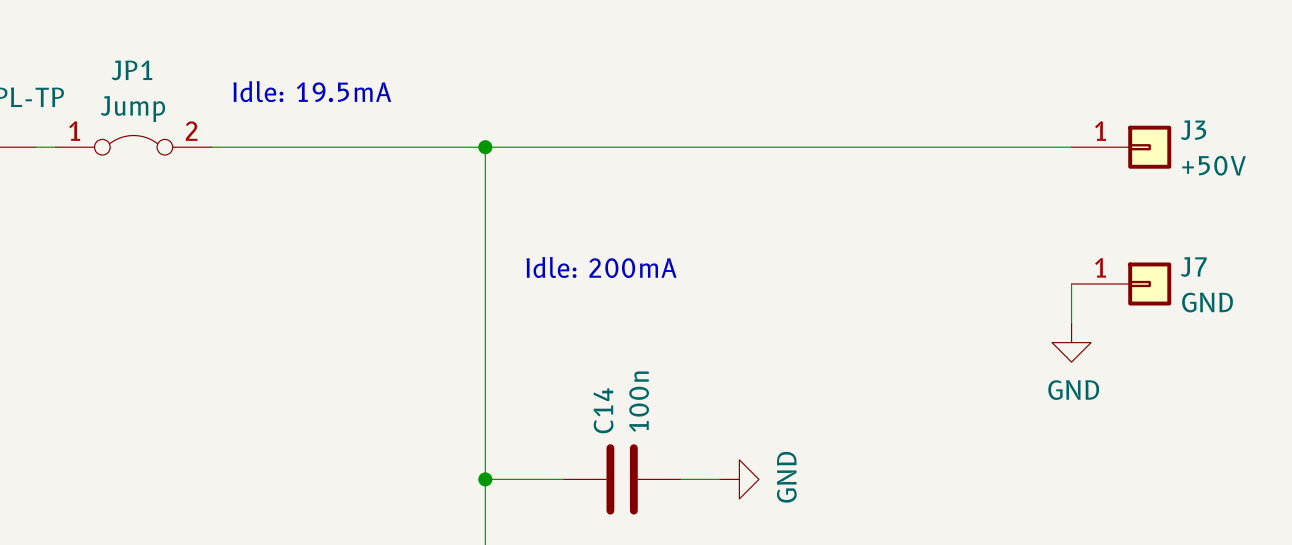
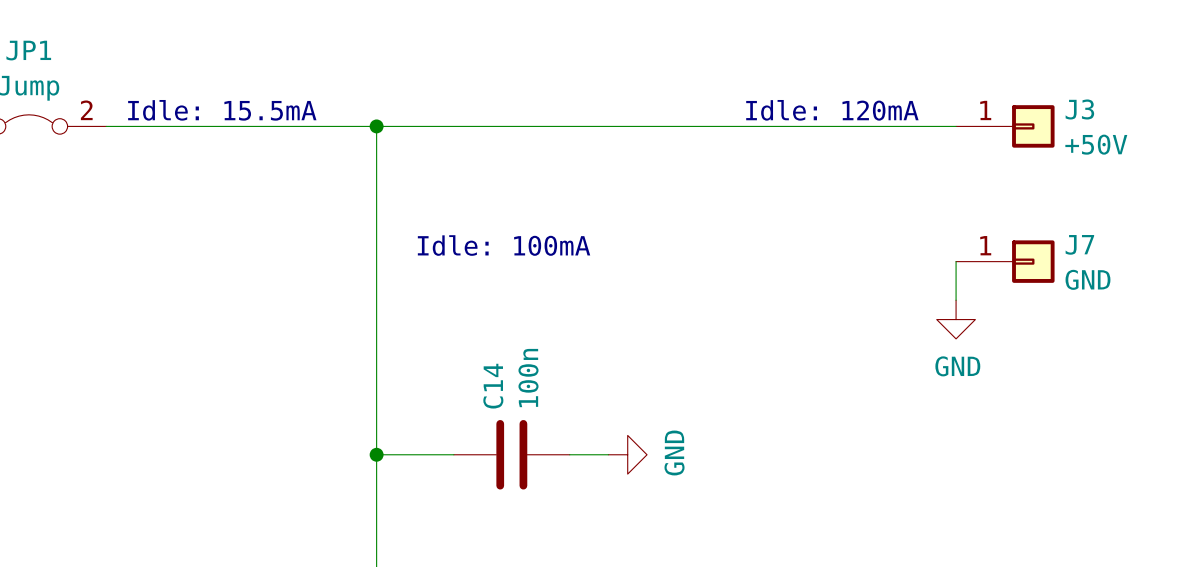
text: Idle: 19.5mA (312, 91) -> Idle: 15.5mA (222, 110)
text: none -> Idle: 120mA (832, 110)
text: Idle: 200mA (601, 267) -> Idle: 100mA (504, 245)

